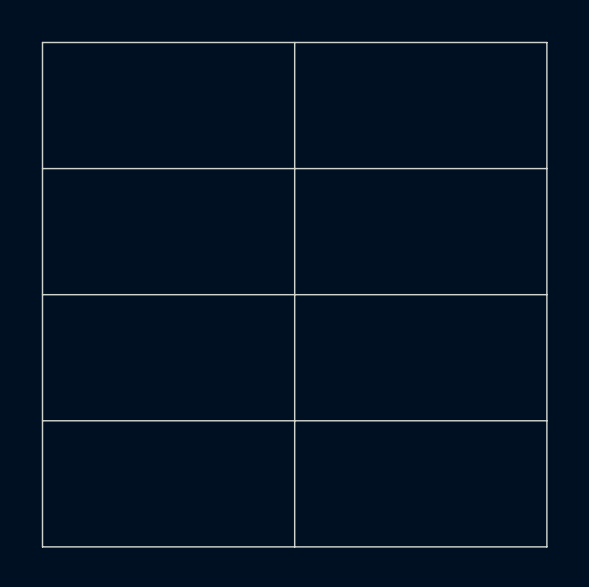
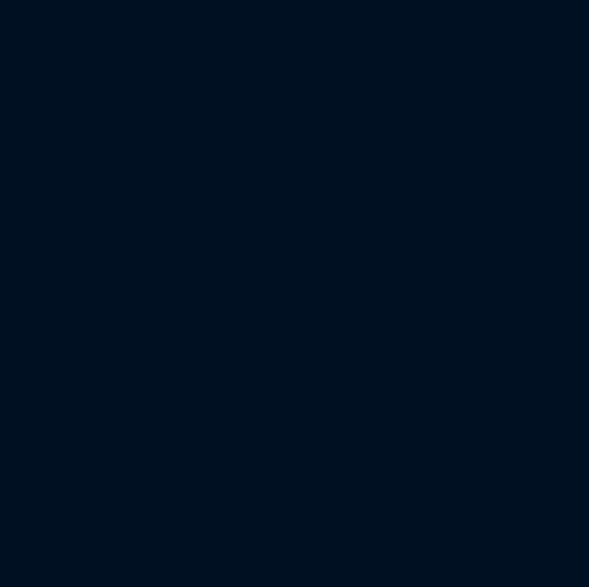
board edge: (294, 42) (294, 546) -> none
board edge: (546, 42) (546, 546) (42, 546) (42, 42) (546, 42) -> none
board edge: (546, 168) (42, 168) -> none
board edge: (546, 294) (42, 294) -> none
board edge: (546, 420) (42, 420) -> none

